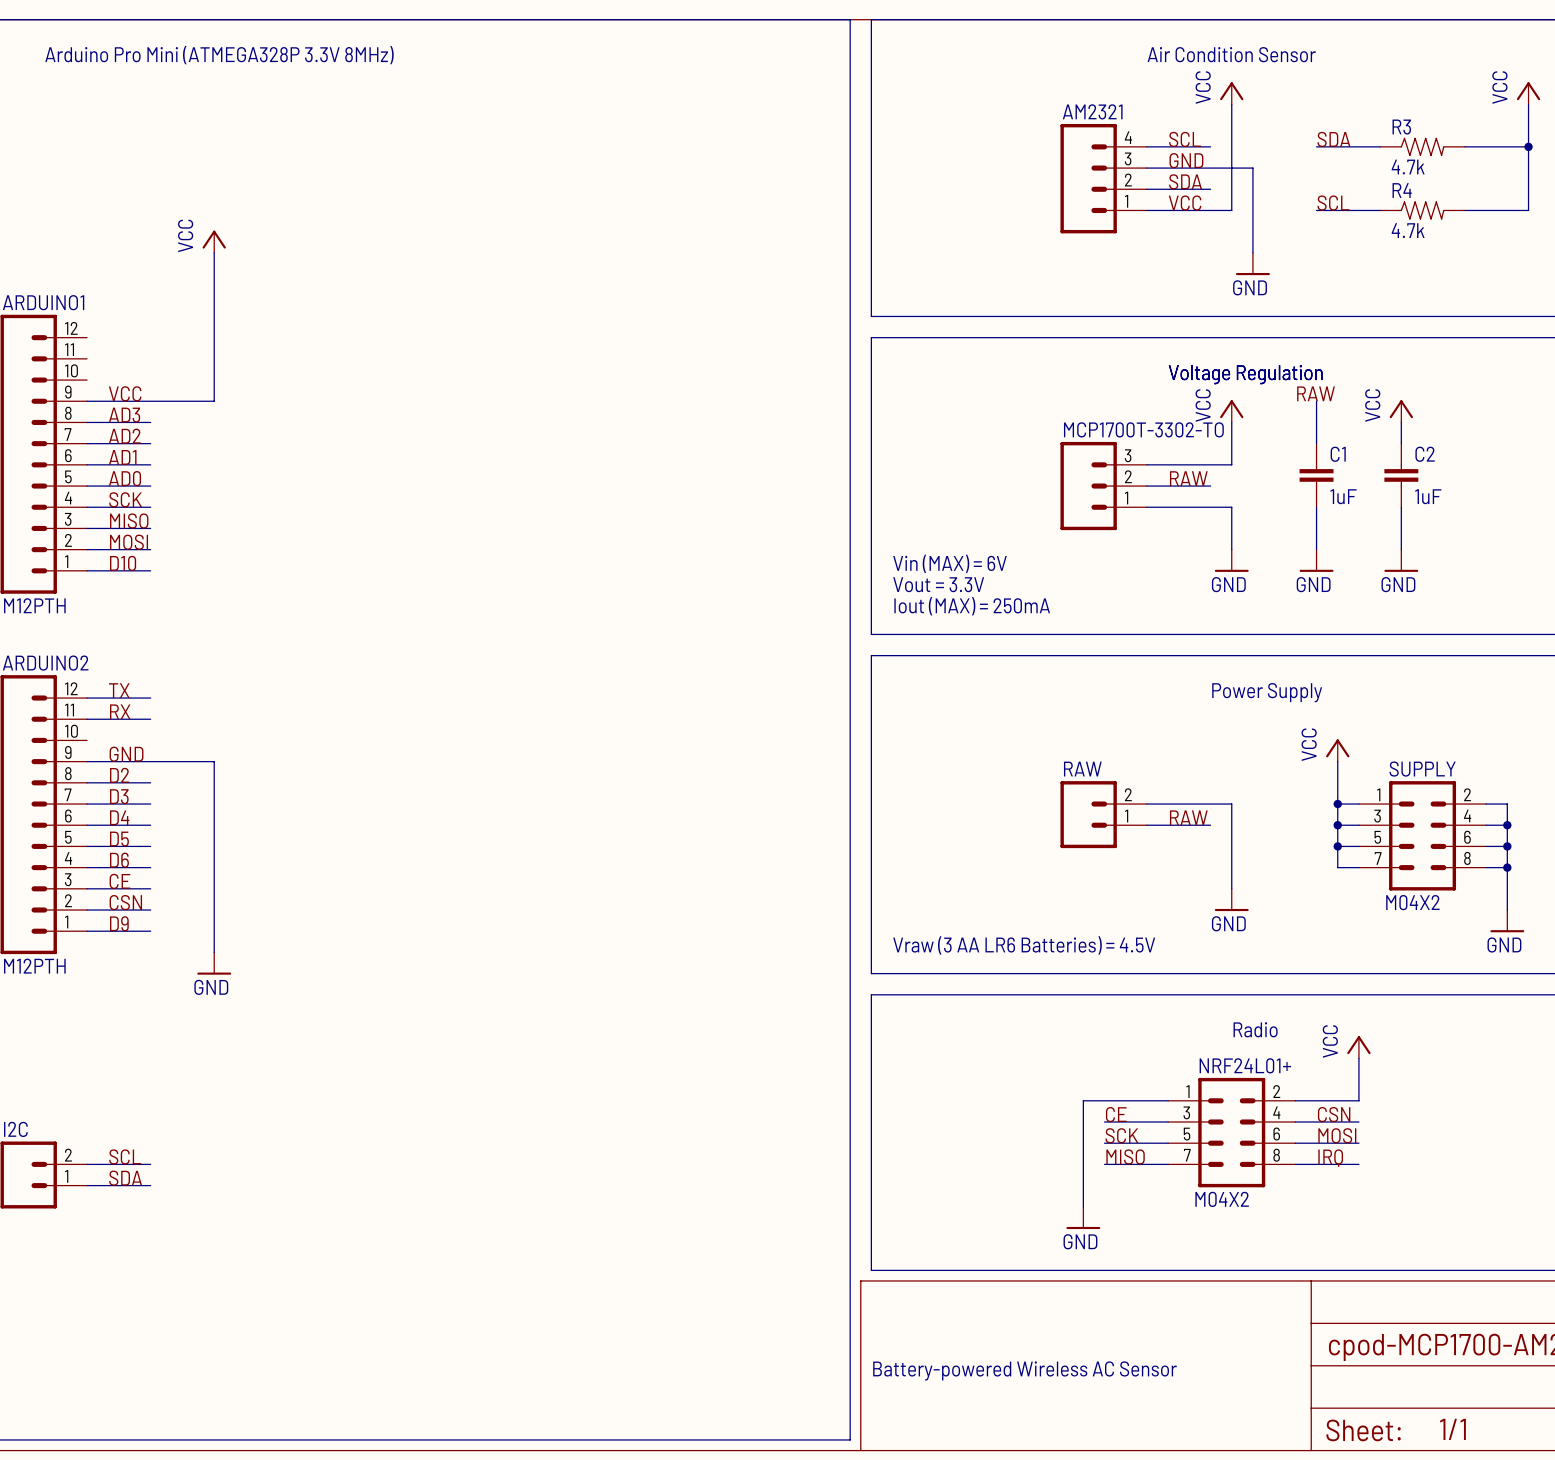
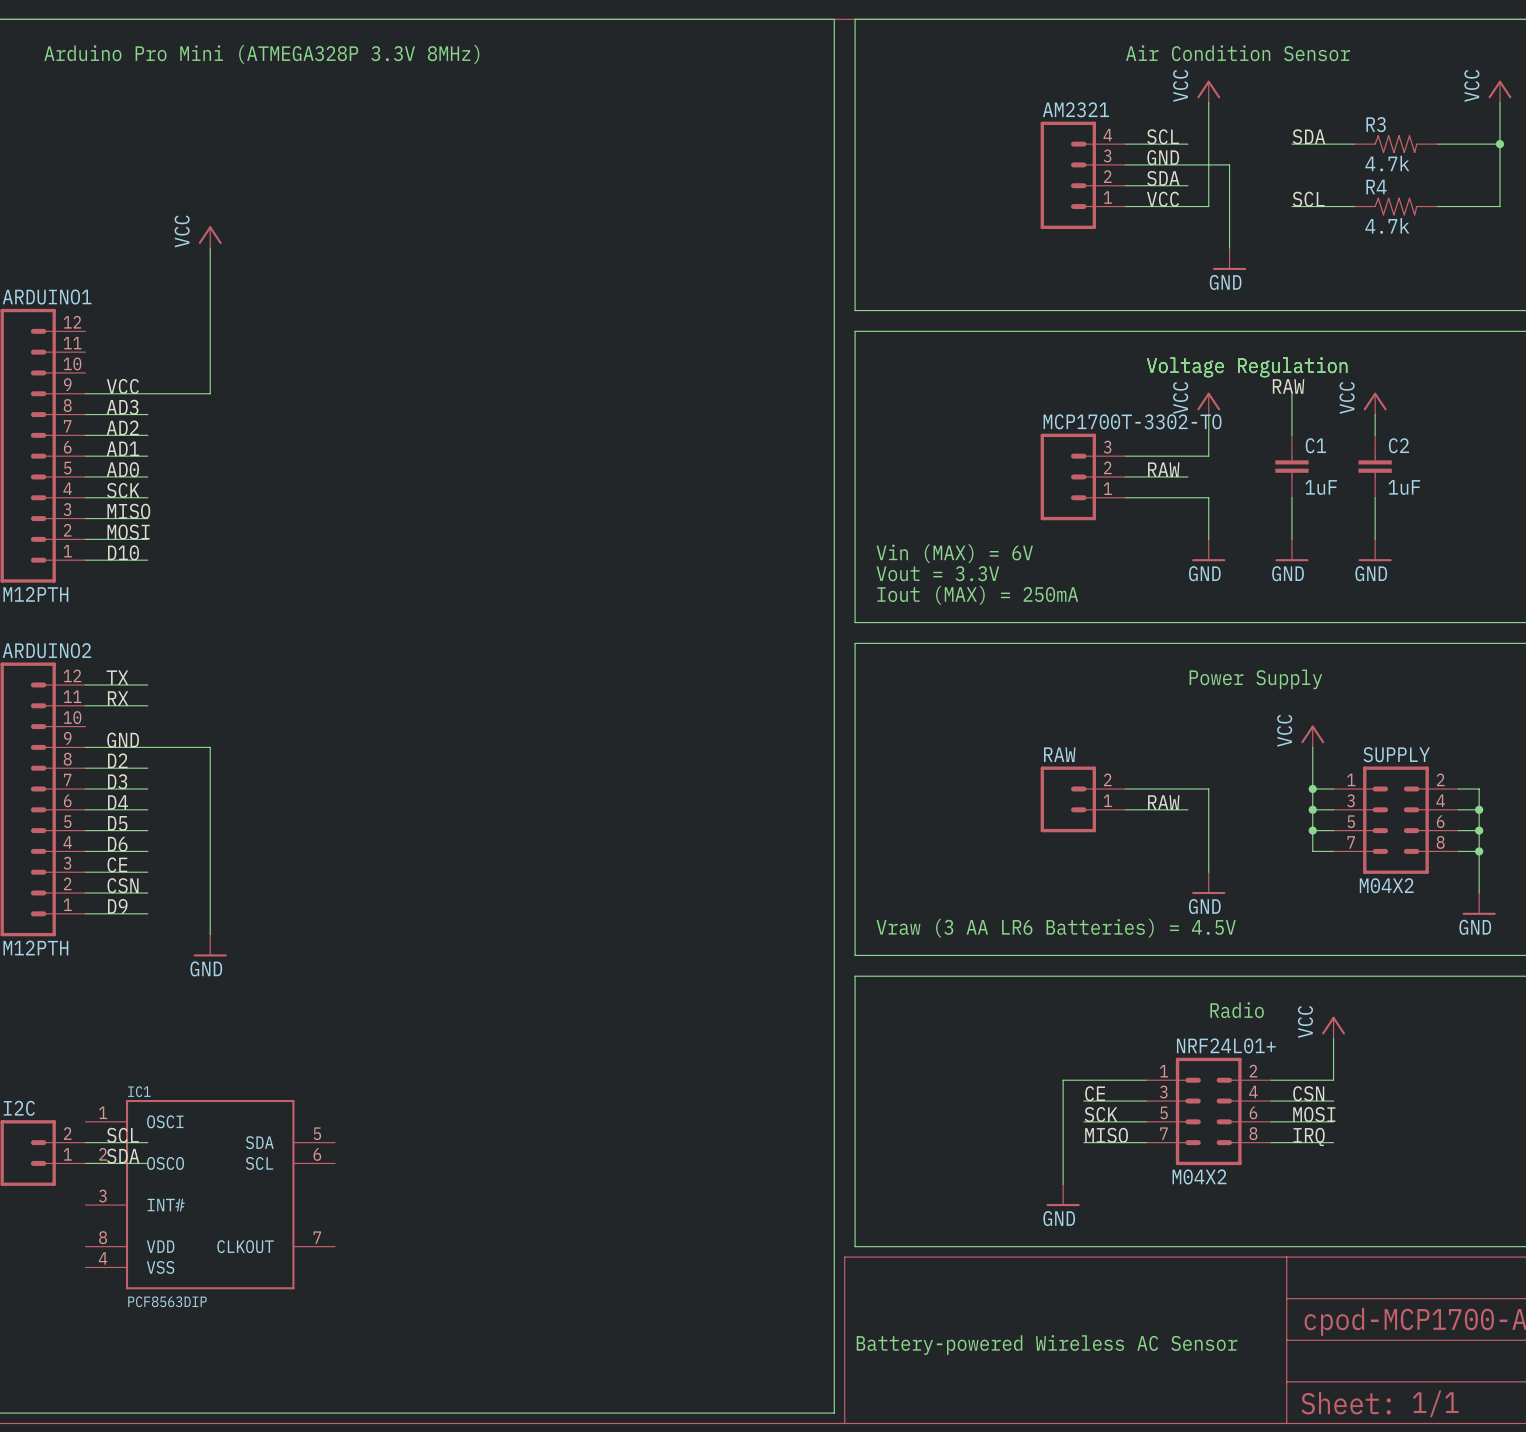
IC1: none -> PCF8563DIP (210, 1194)

